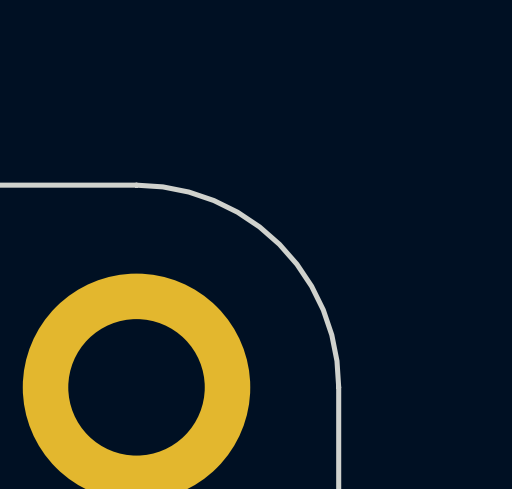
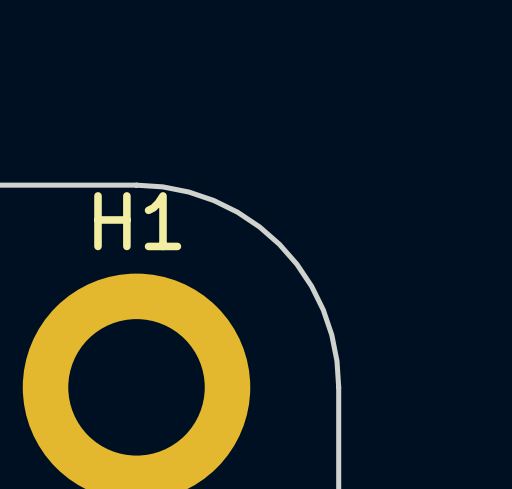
H1 name: none -> H1 (137, 221)

